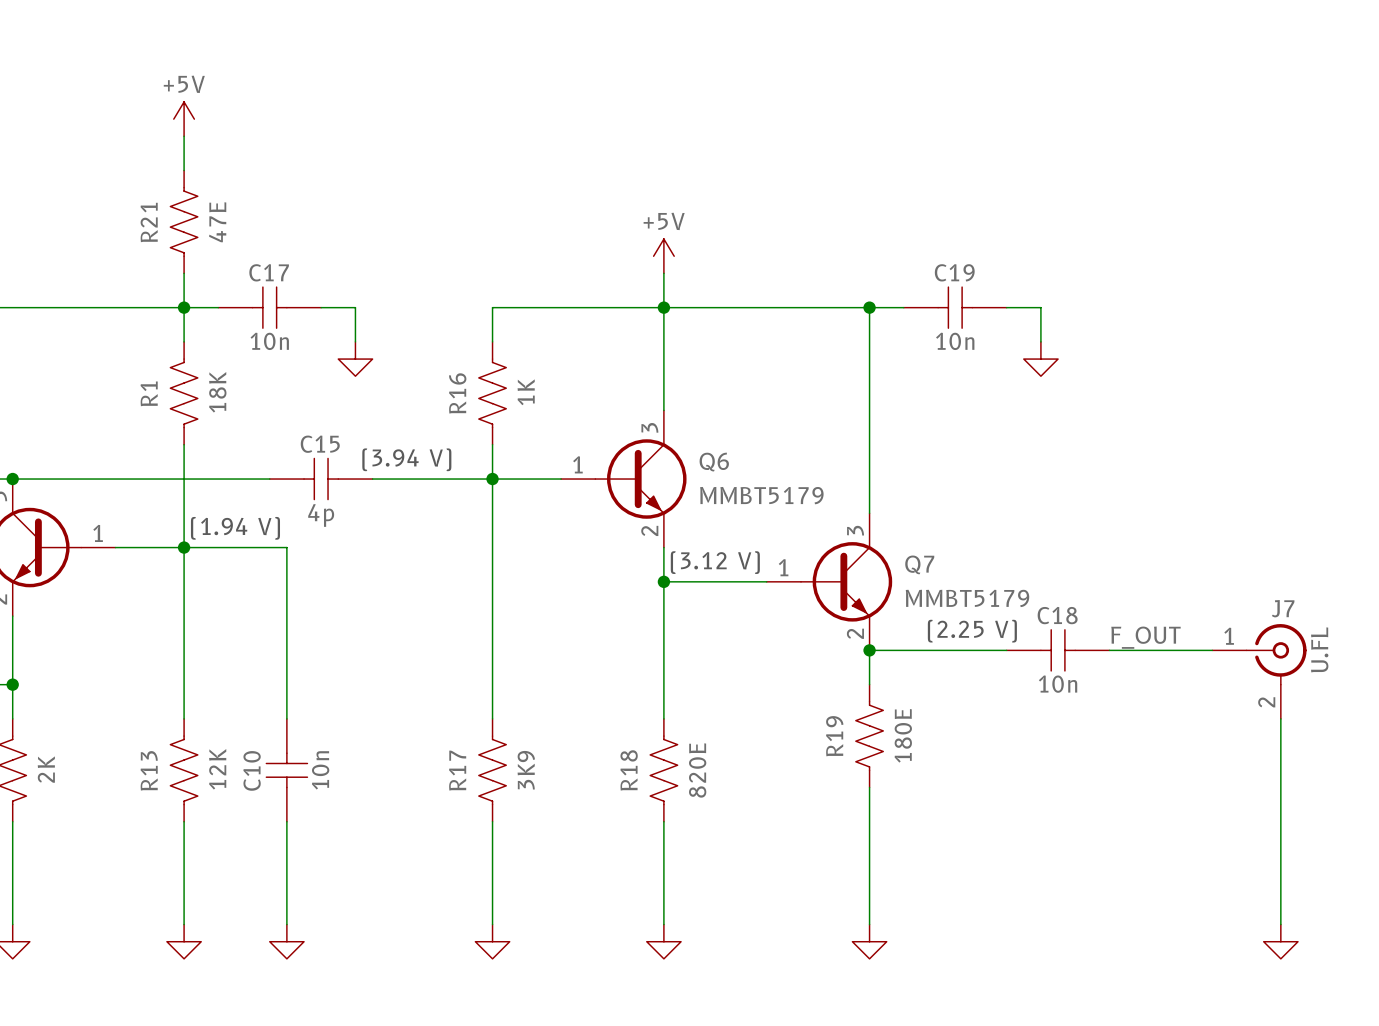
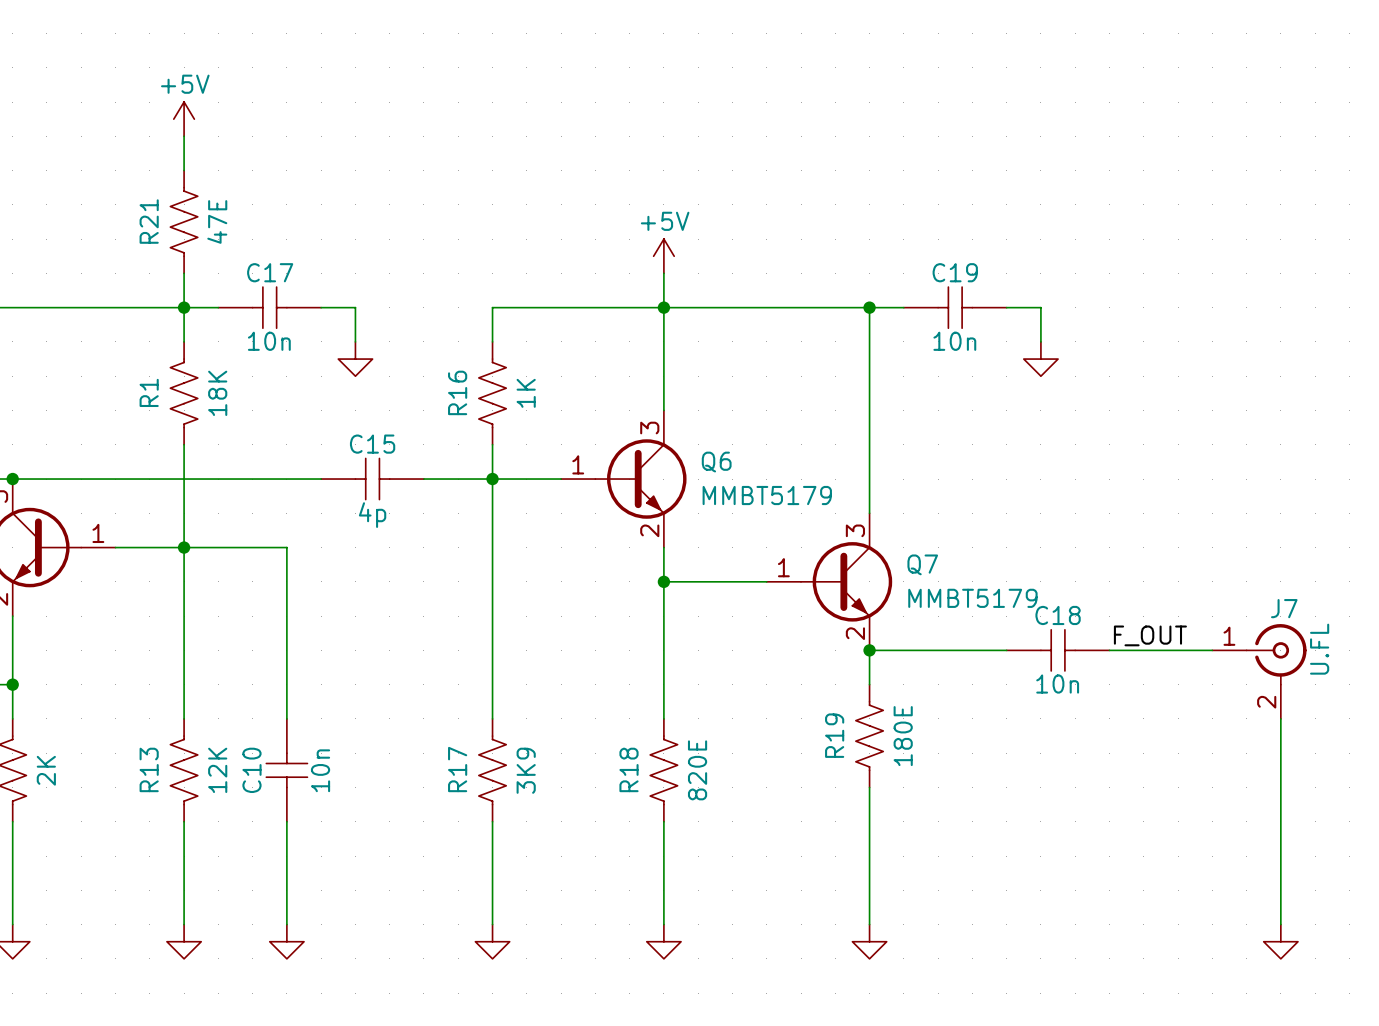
text: (3.94 V) (406, 459) -> none
C15 position: (321, 479) -> (372, 479)
text: (1.94 V) (235, 528) -> none
text: (3.12 V) (715, 562) -> none
text: (2.25 V) (972, 631) -> none

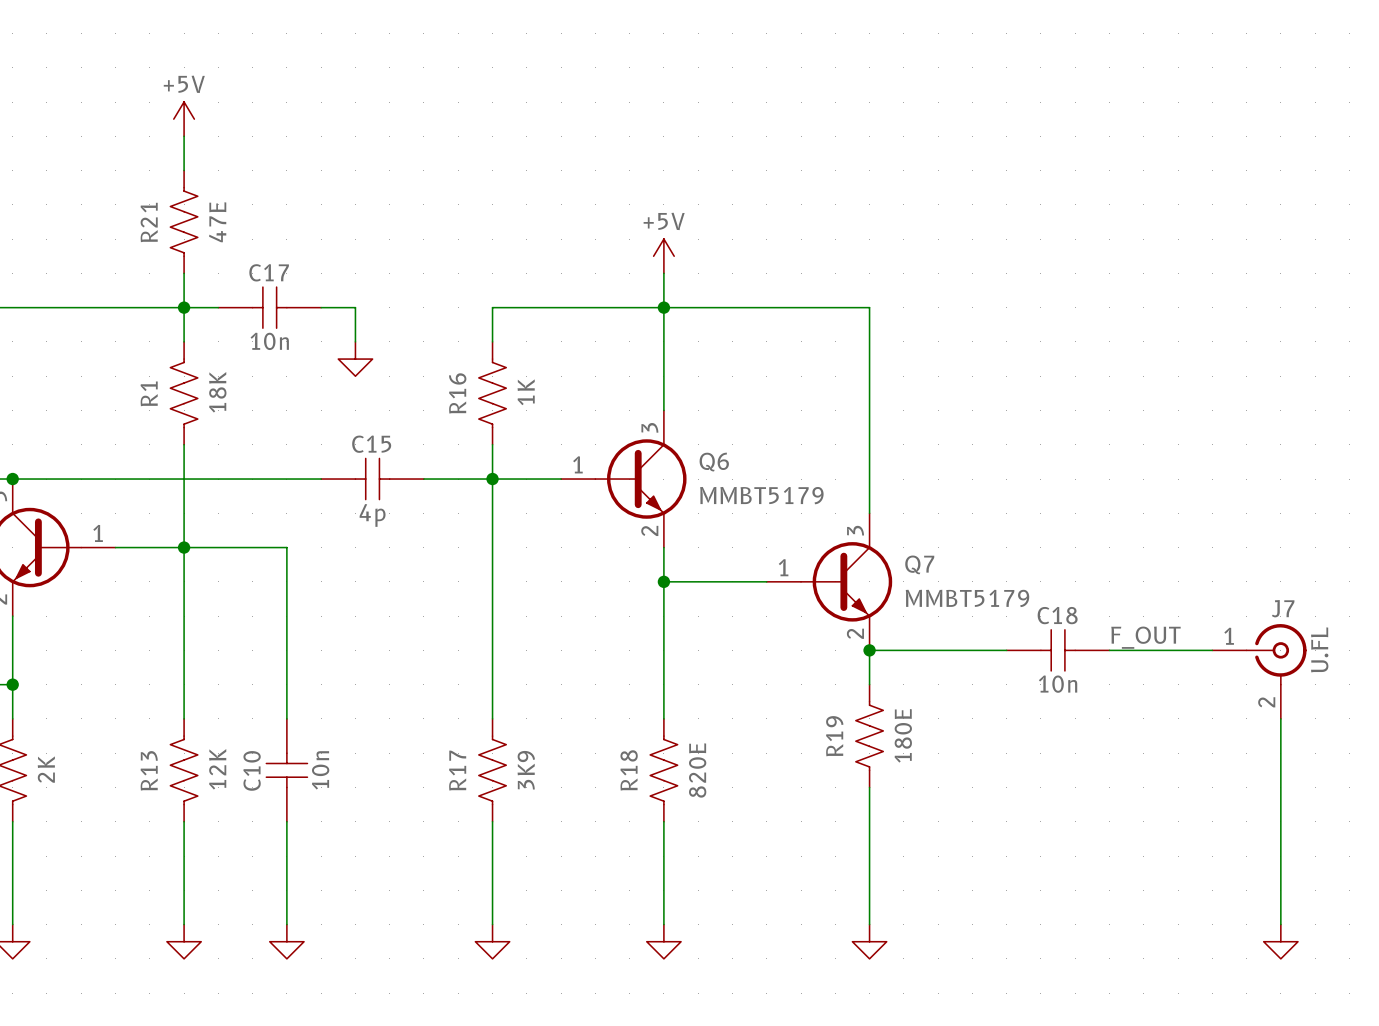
wire: (869, 307) (903, 307) -> none
junction: (869, 307) -> none
C19: 10n (955, 307) -> none
wire: (1006, 307) (1040, 307) (1040, 341) -> none
power symbol: (1040, 359) -> none

